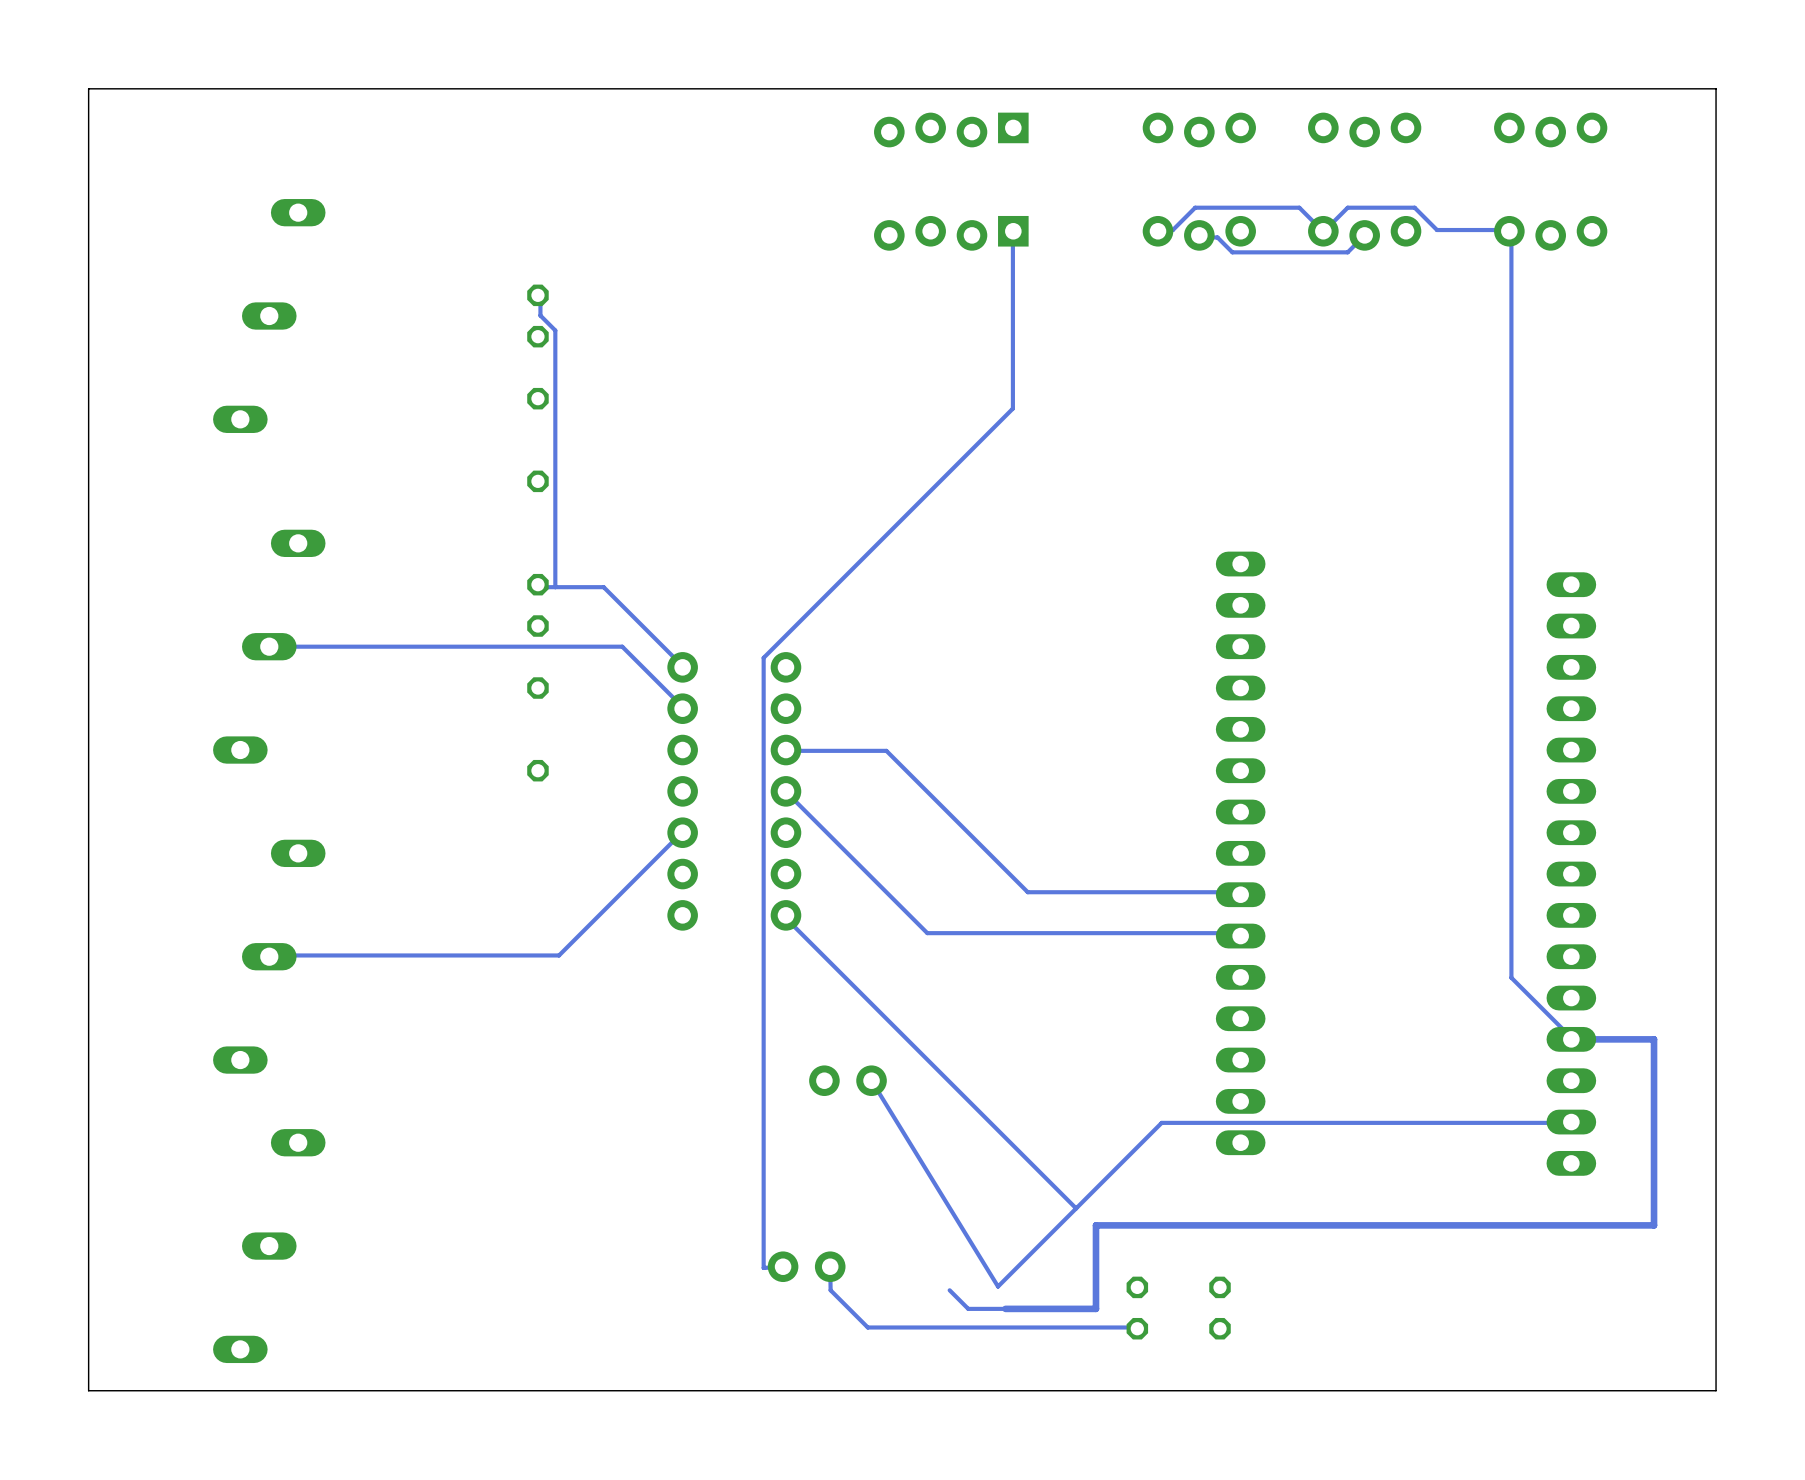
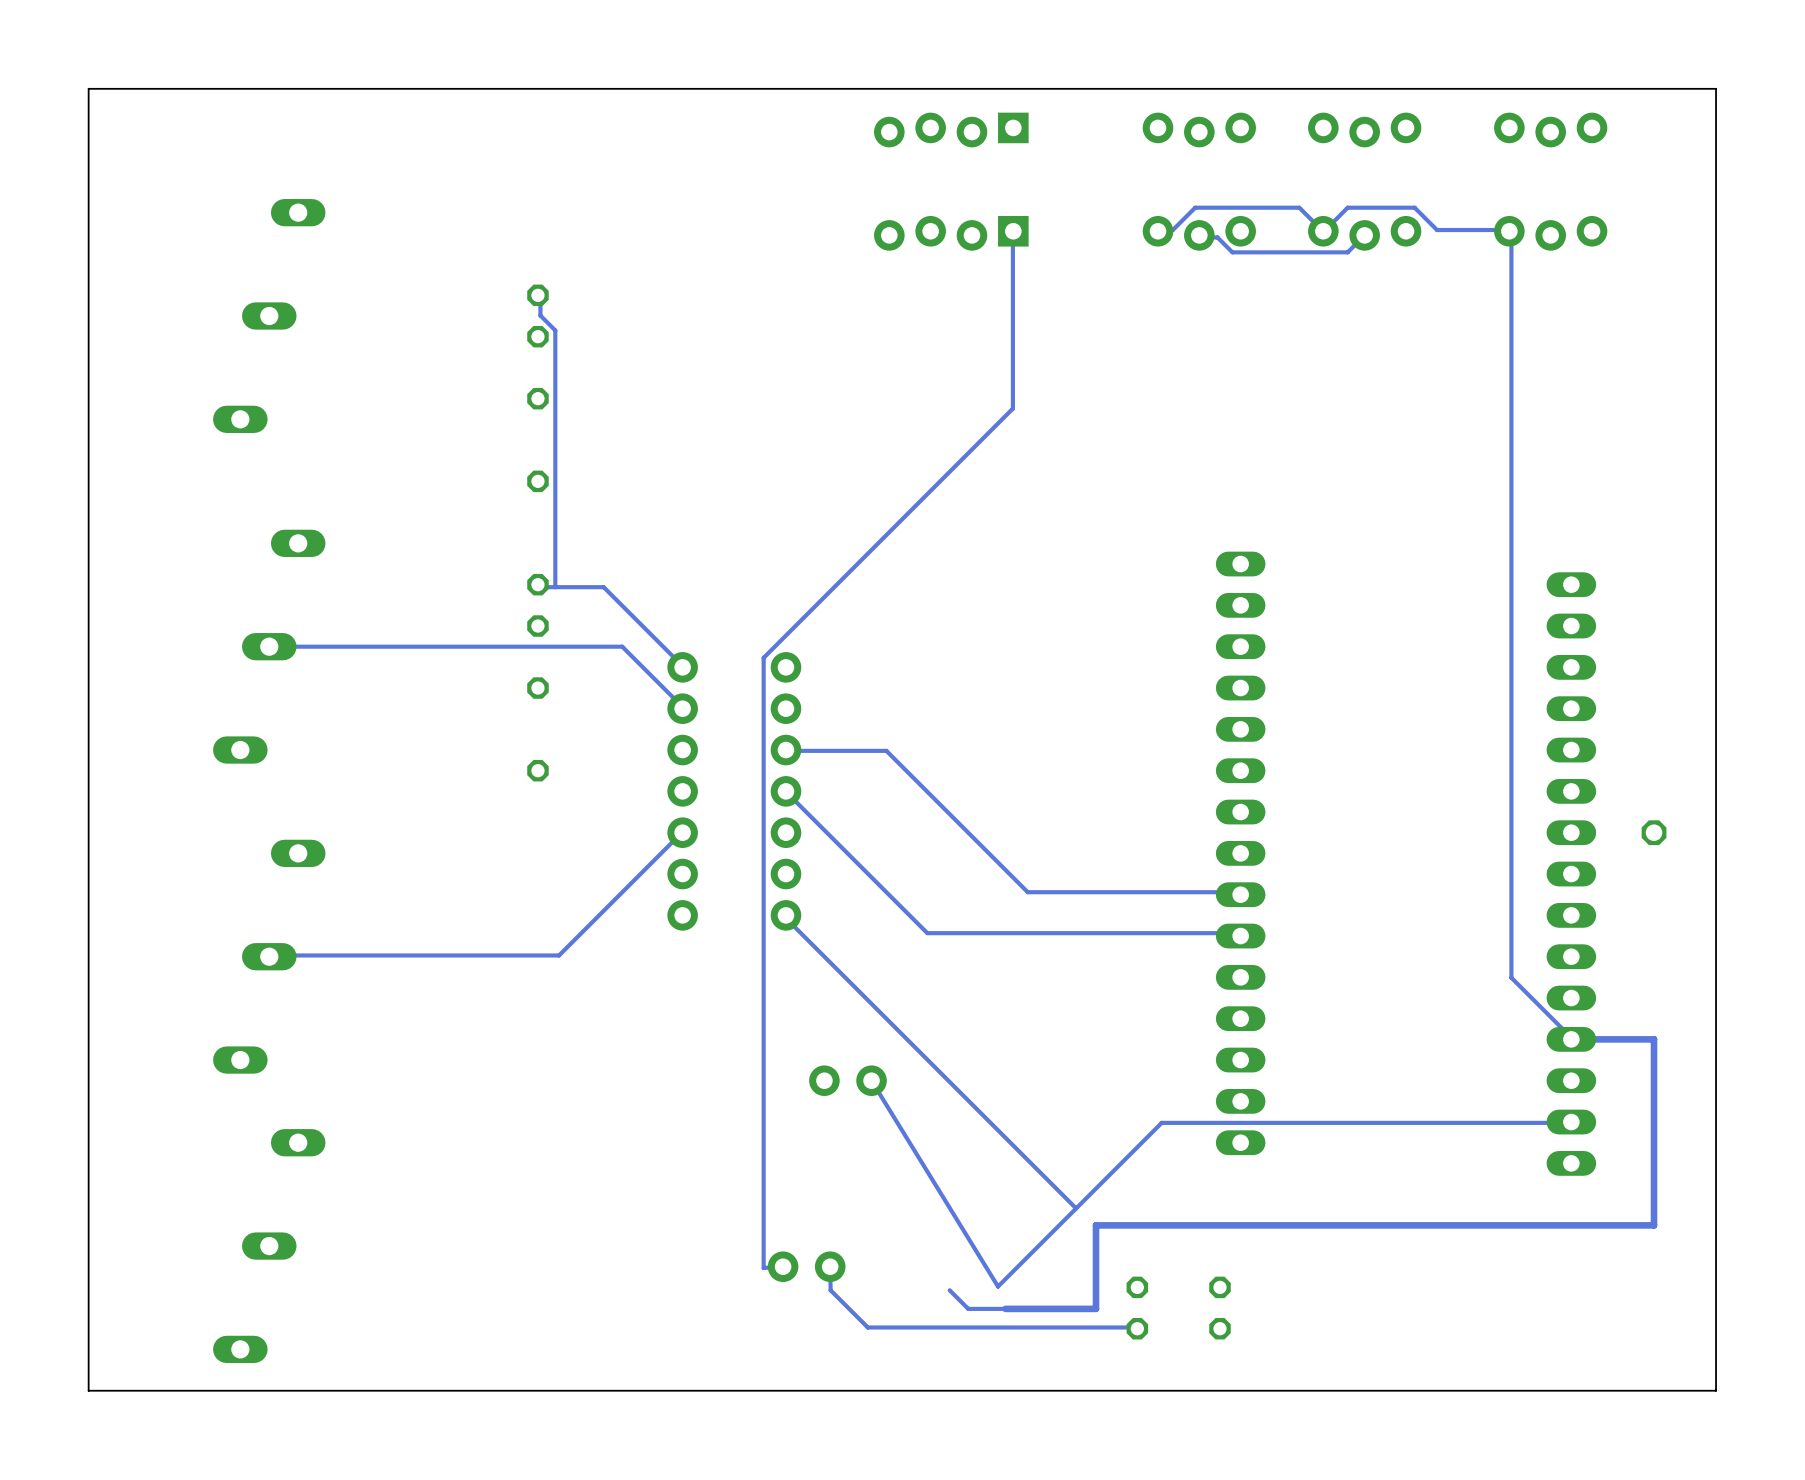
part: none -> (1654, 832)

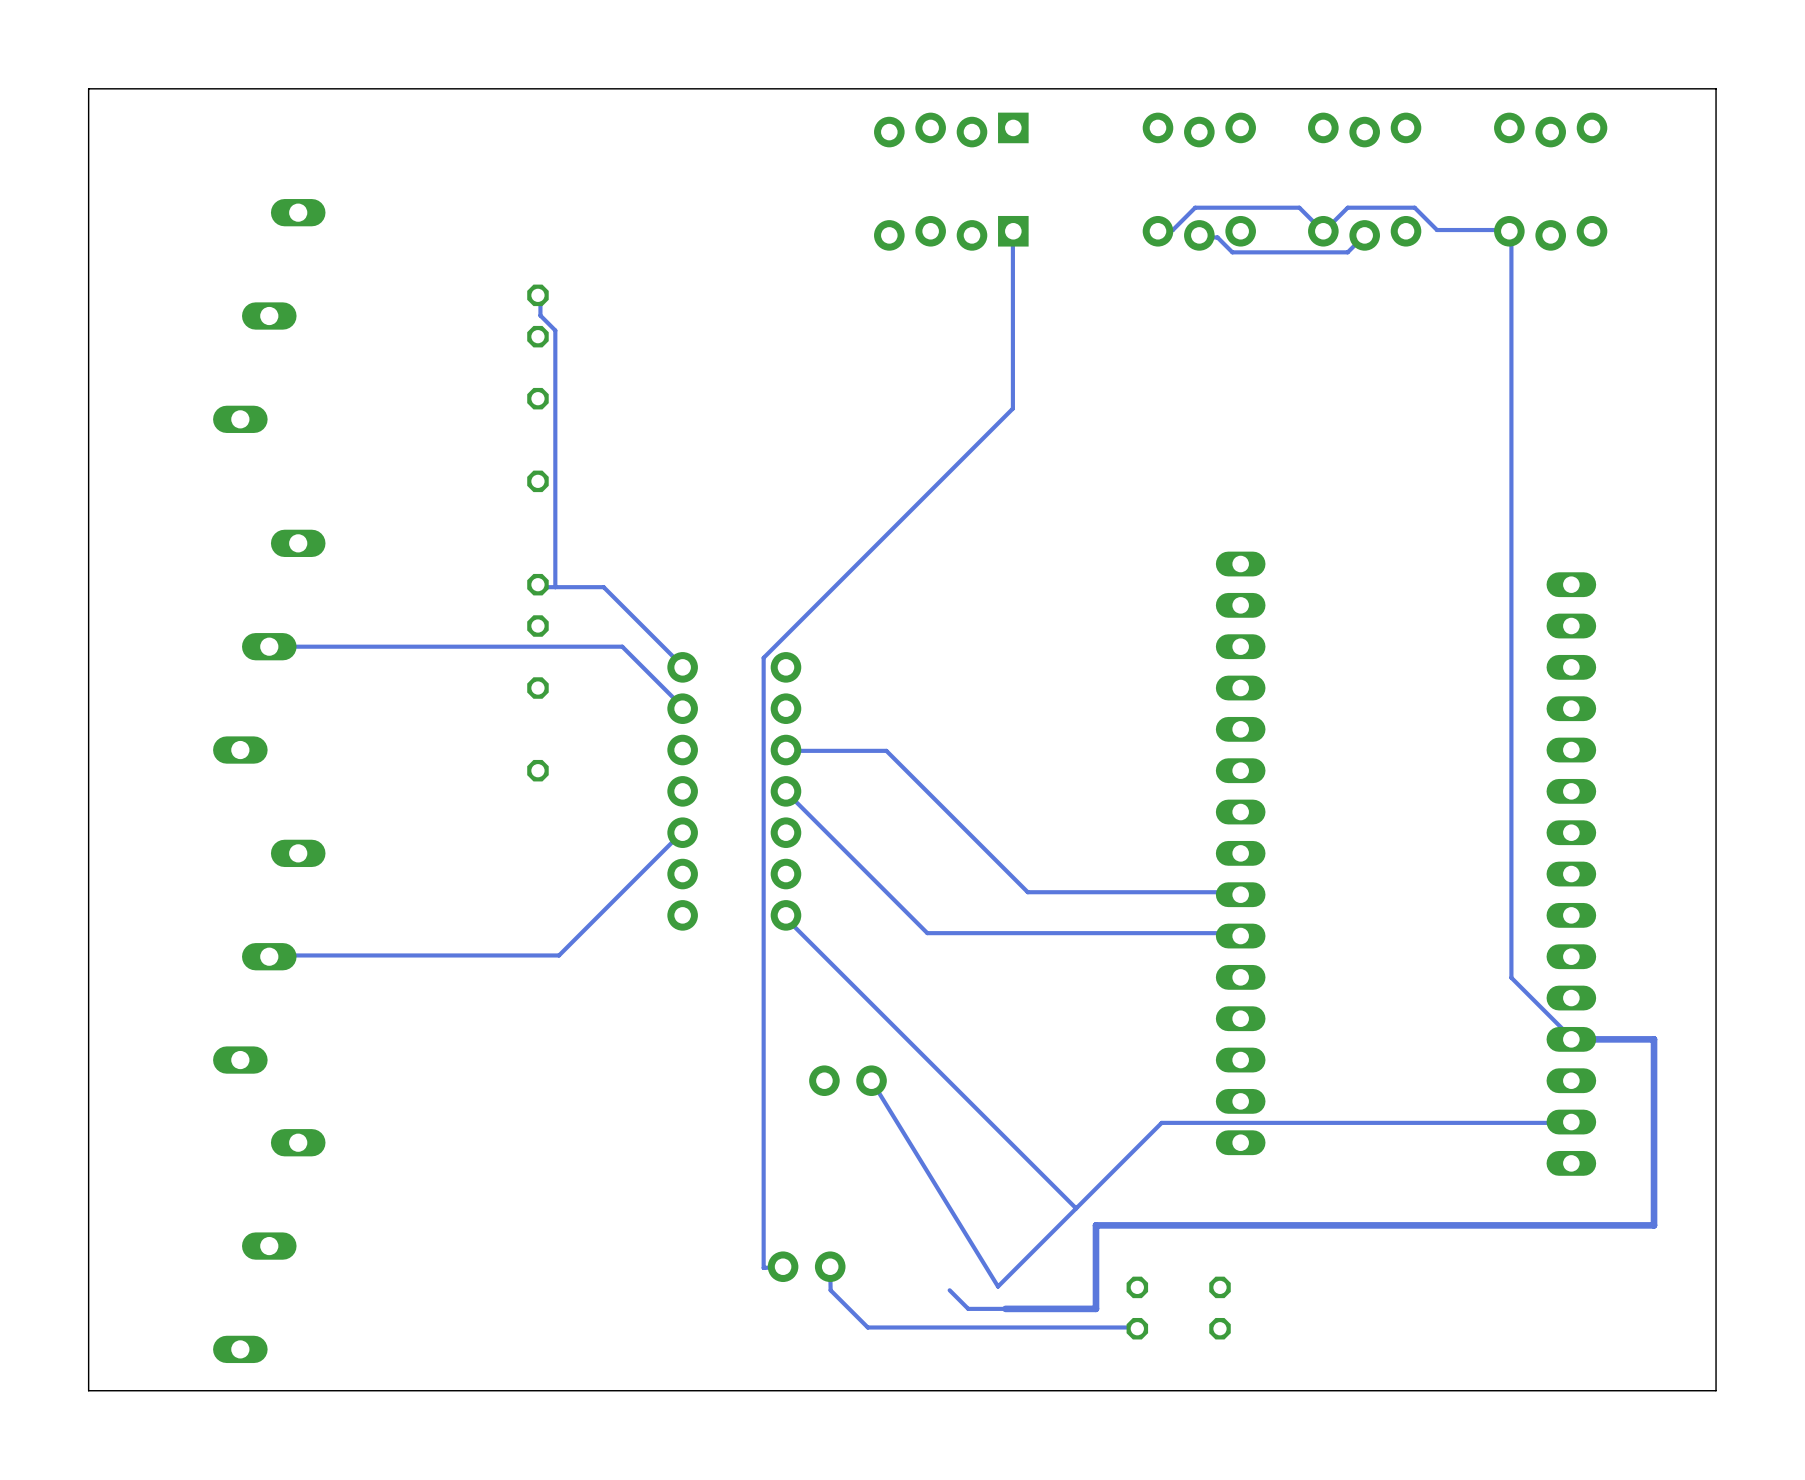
part: (1654, 832) -> none

